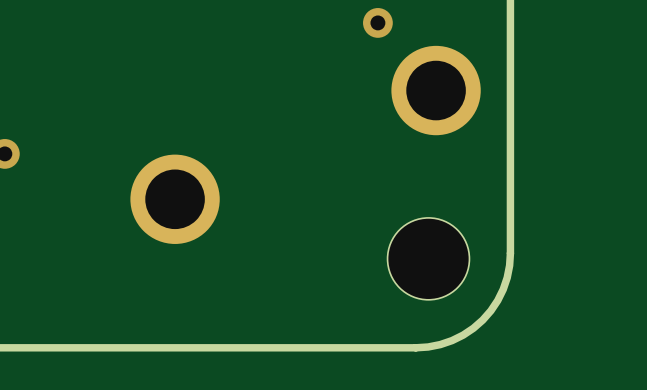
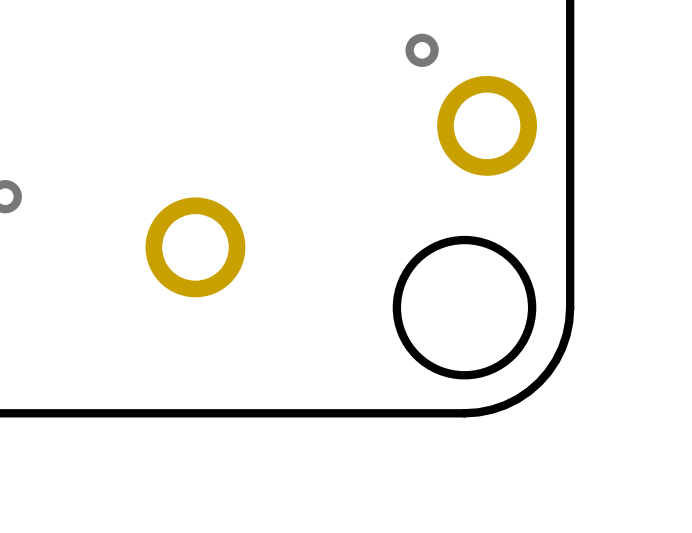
round board edge: none -> [392, 235, 537, 380]
part: (428, 258) -> none

